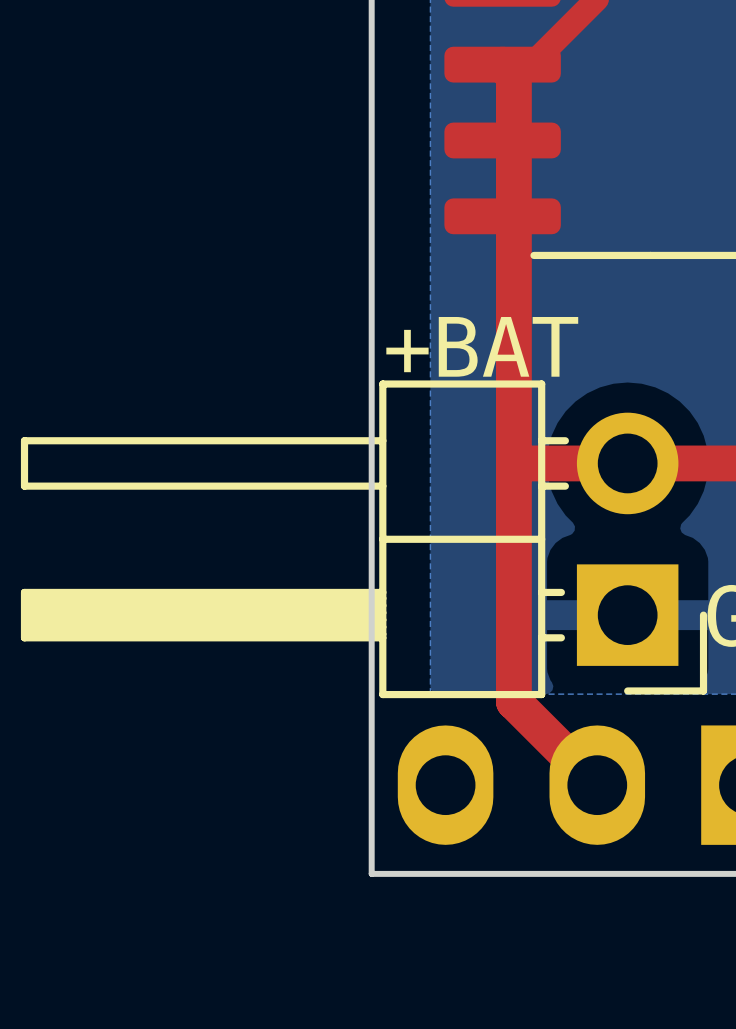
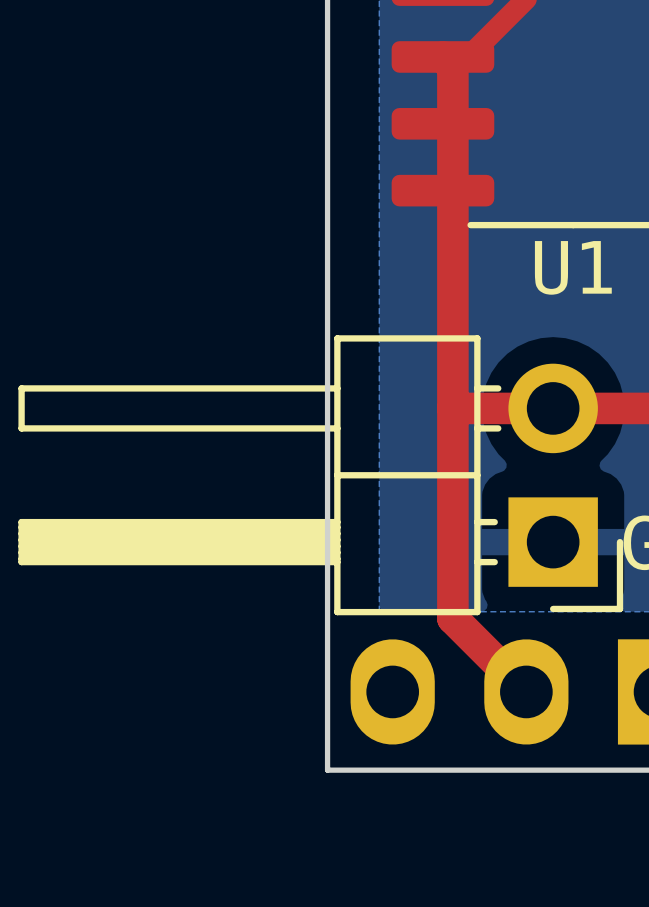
U1 name: none -> U1 (573, 267)
text: +BAT (482, 346) -> none

